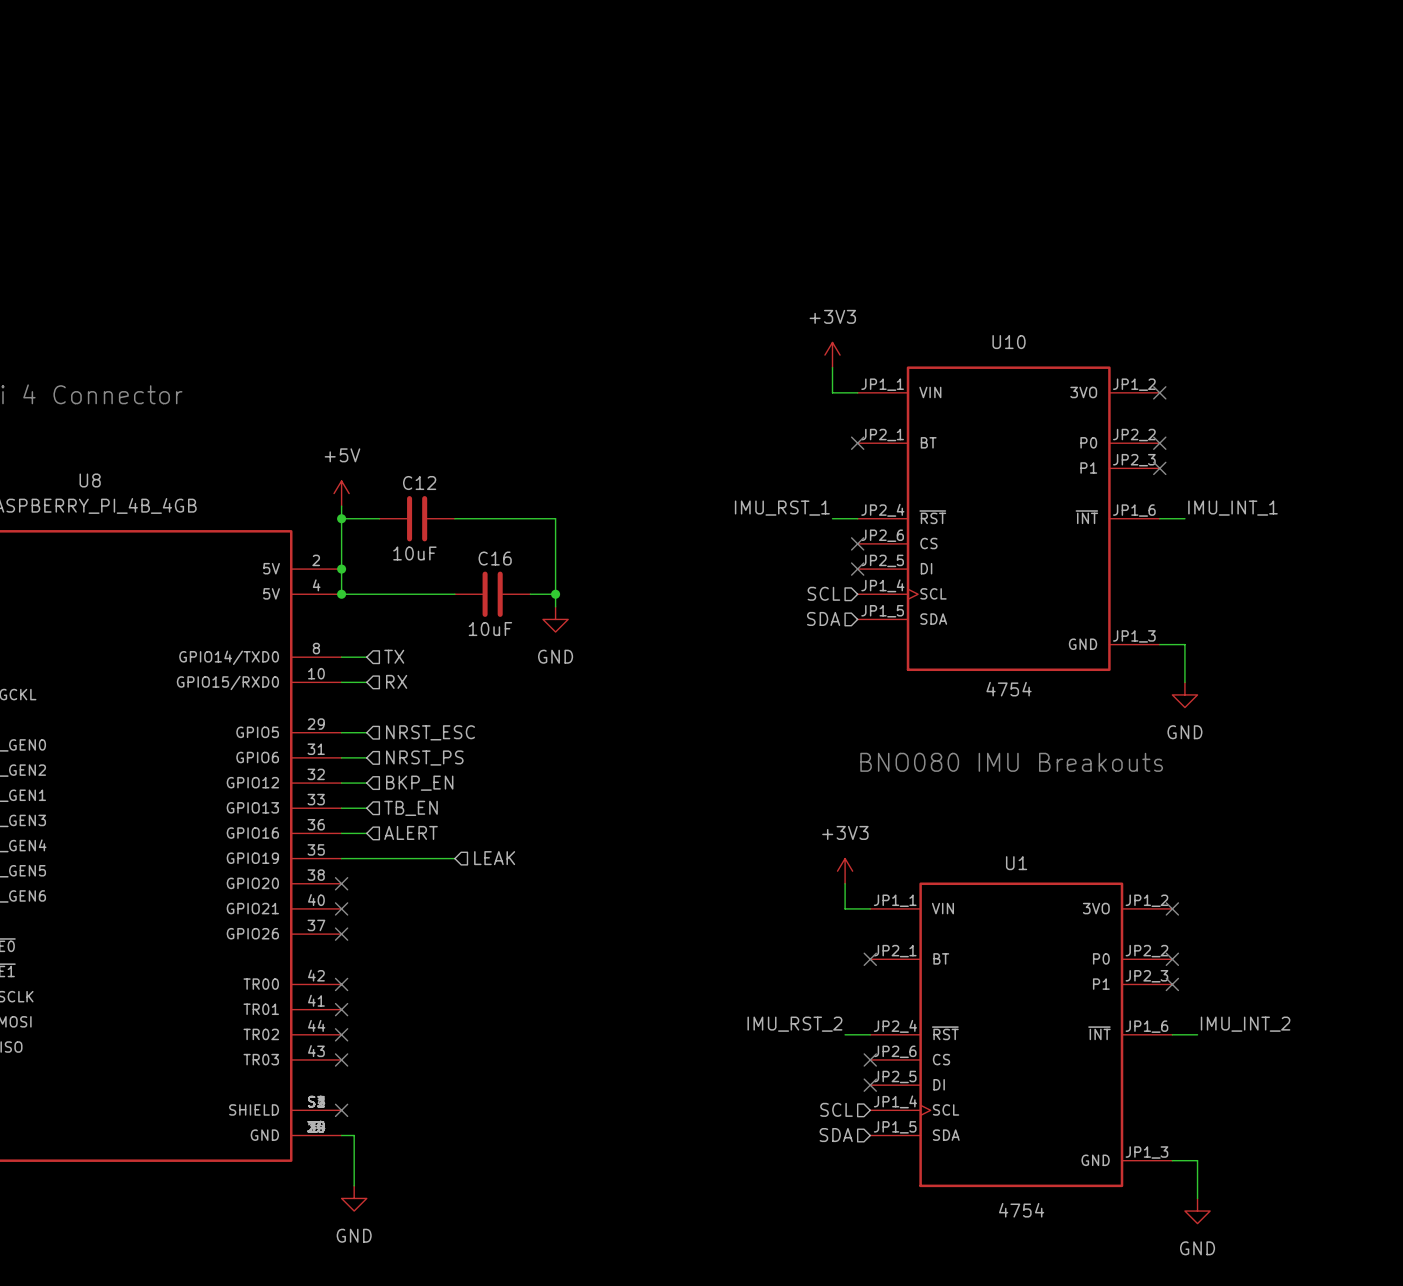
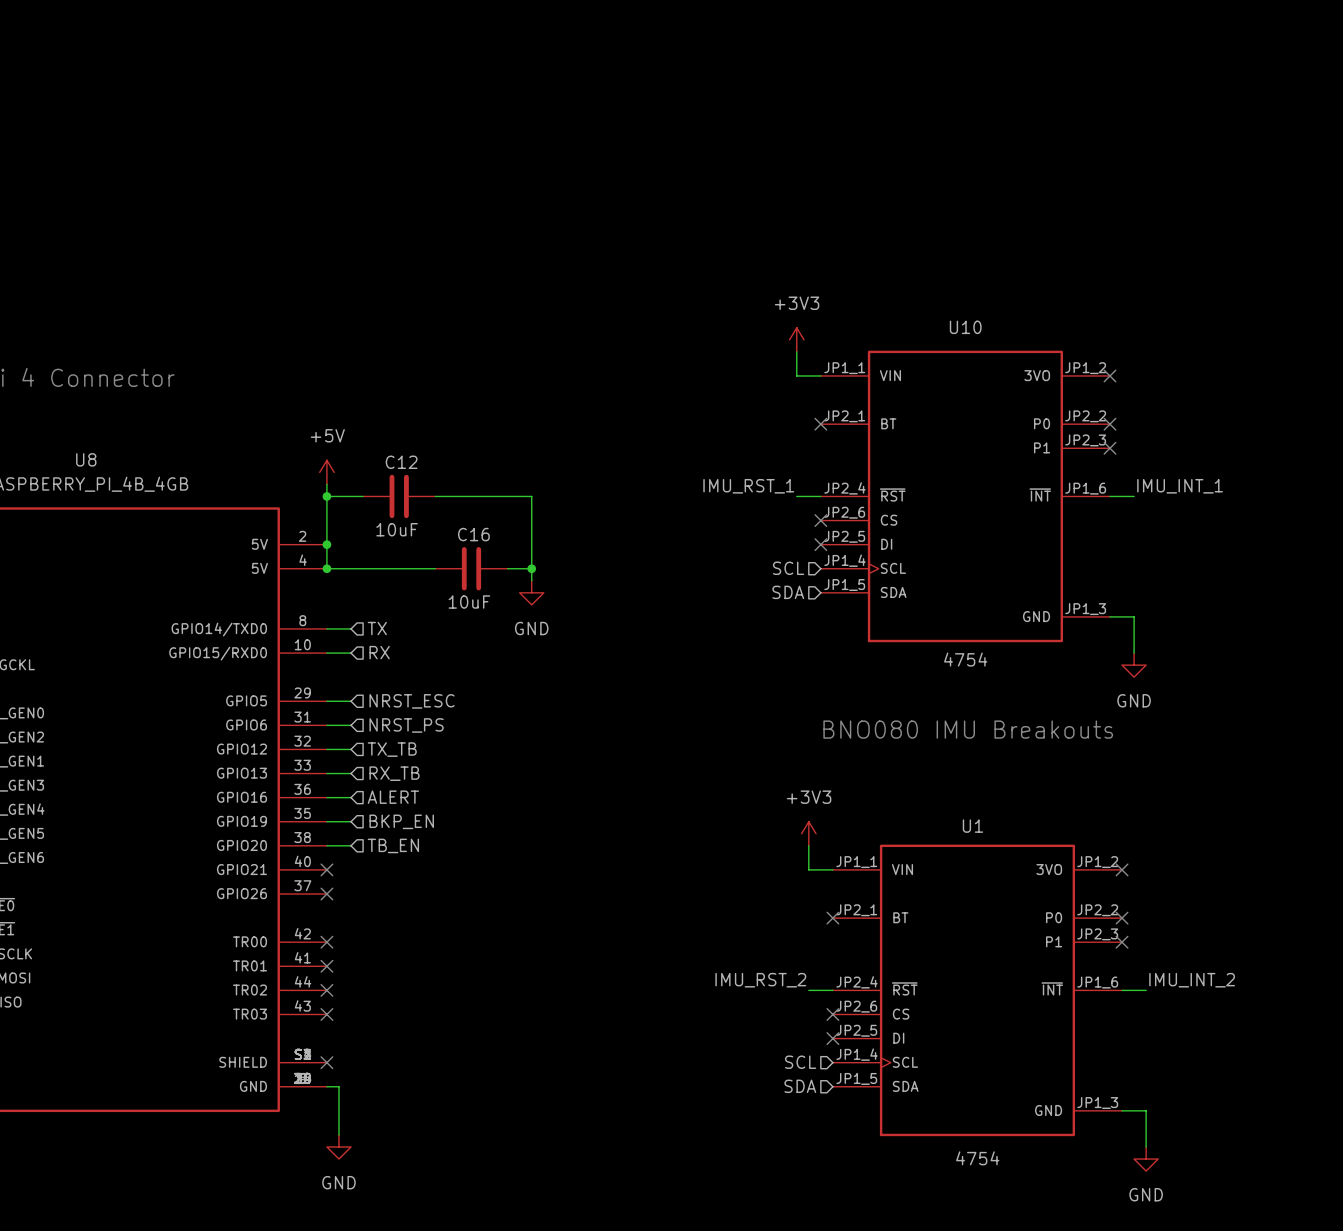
hierarchical label: BKP_EN (419, 783) -> TX_TB (392, 749)
hierarchical label: TB_EN (411, 808) -> RX_TB (394, 773)
wire: (366, 858) (454, 858) -> none
hierarchical label: none -> BKP_EN (401, 821)
hierarchical label: LEAK (494, 858) -> none
wire: none -> (326, 845) (351, 845)
no-connect mark: (341, 883) -> none
hierarchical label: none -> TB_EN (393, 845)

